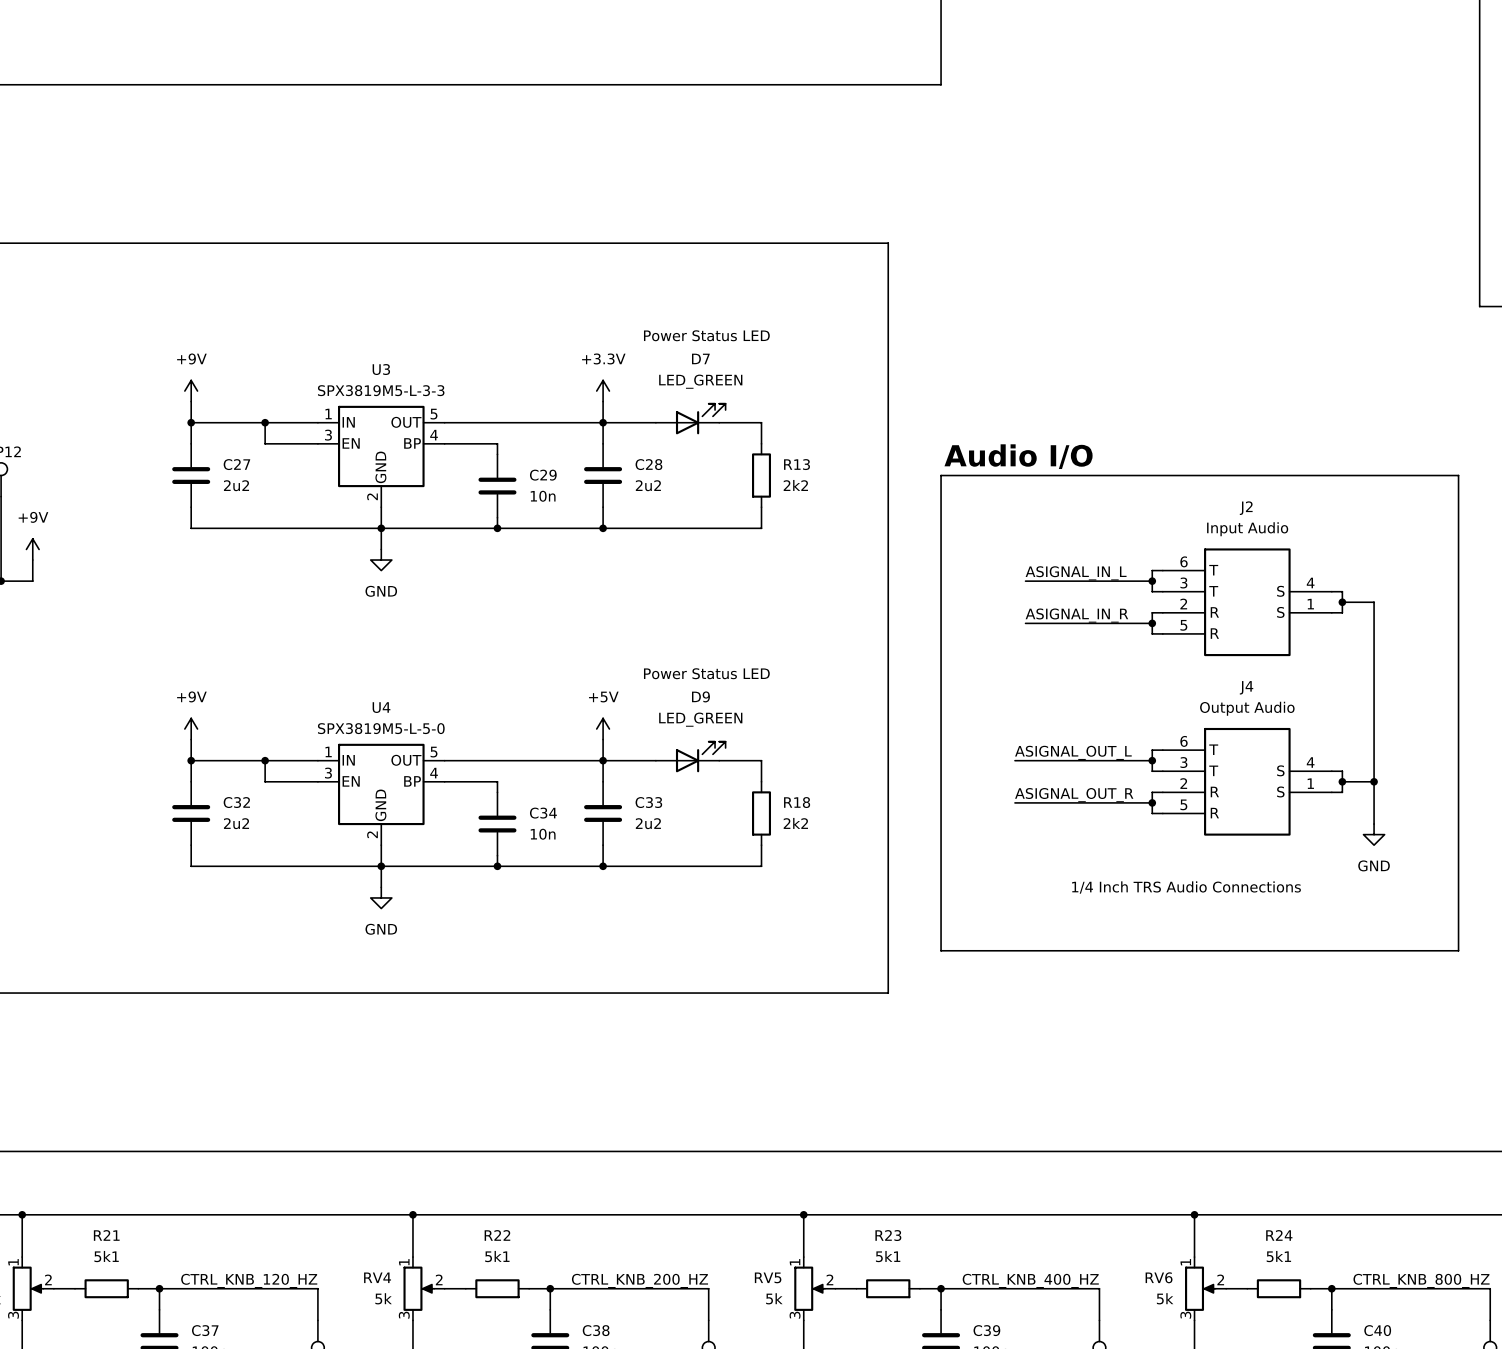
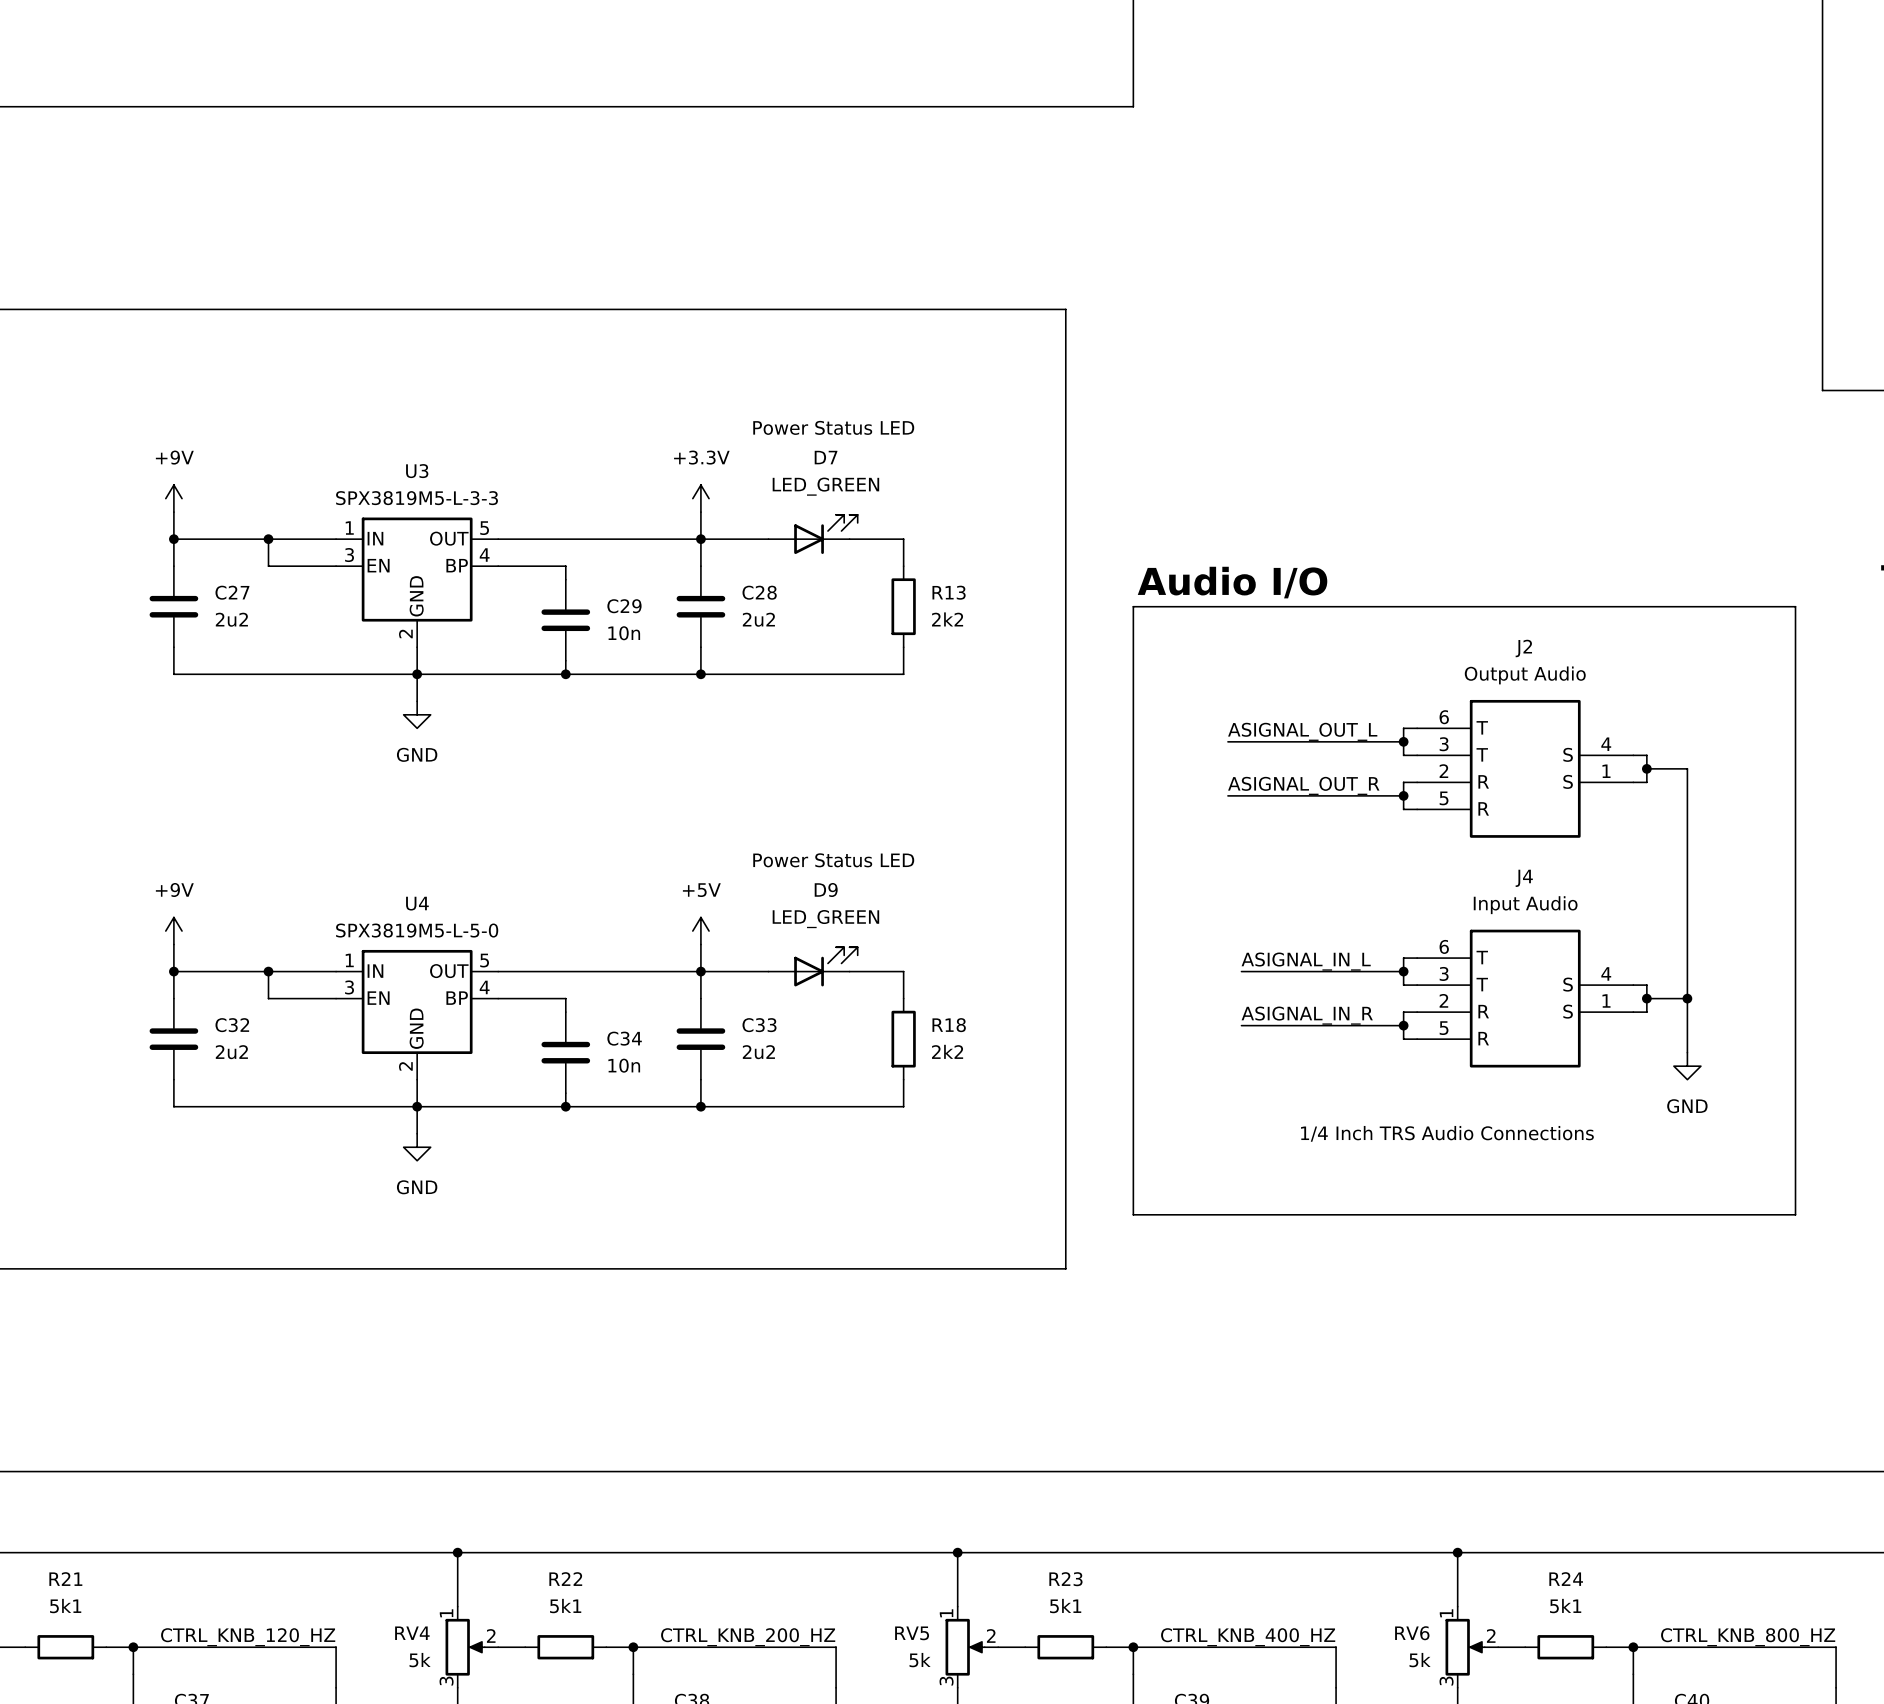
J2 value: Input Audio (1247, 529) -> Output Audio (1525, 675)
label position: ASIGNAL_IN_L (1076, 573) -> ASIGNAL_IN_L (1306, 961)
wire: none -> (1227, 741) (1241, 741)
label position: ASIGNAL_IN_R (1076, 615) -> ASIGNAL_IN_R (1307, 1015)
J4 value: Output Audio (1247, 708) -> Input Audio (1525, 905)
label position: ASIGNAL_OUT_L (1073, 752) -> ASIGNAL_OUT_L (1302, 731)
wire: (1014, 760) (1025, 760) -> (1227, 795) (1241, 795)
label position: ASIGNAL_OUT_R (1074, 795) -> ASIGNAL_OUT_R (1303, 785)
wire: (1014, 802) (1025, 802) -> none

